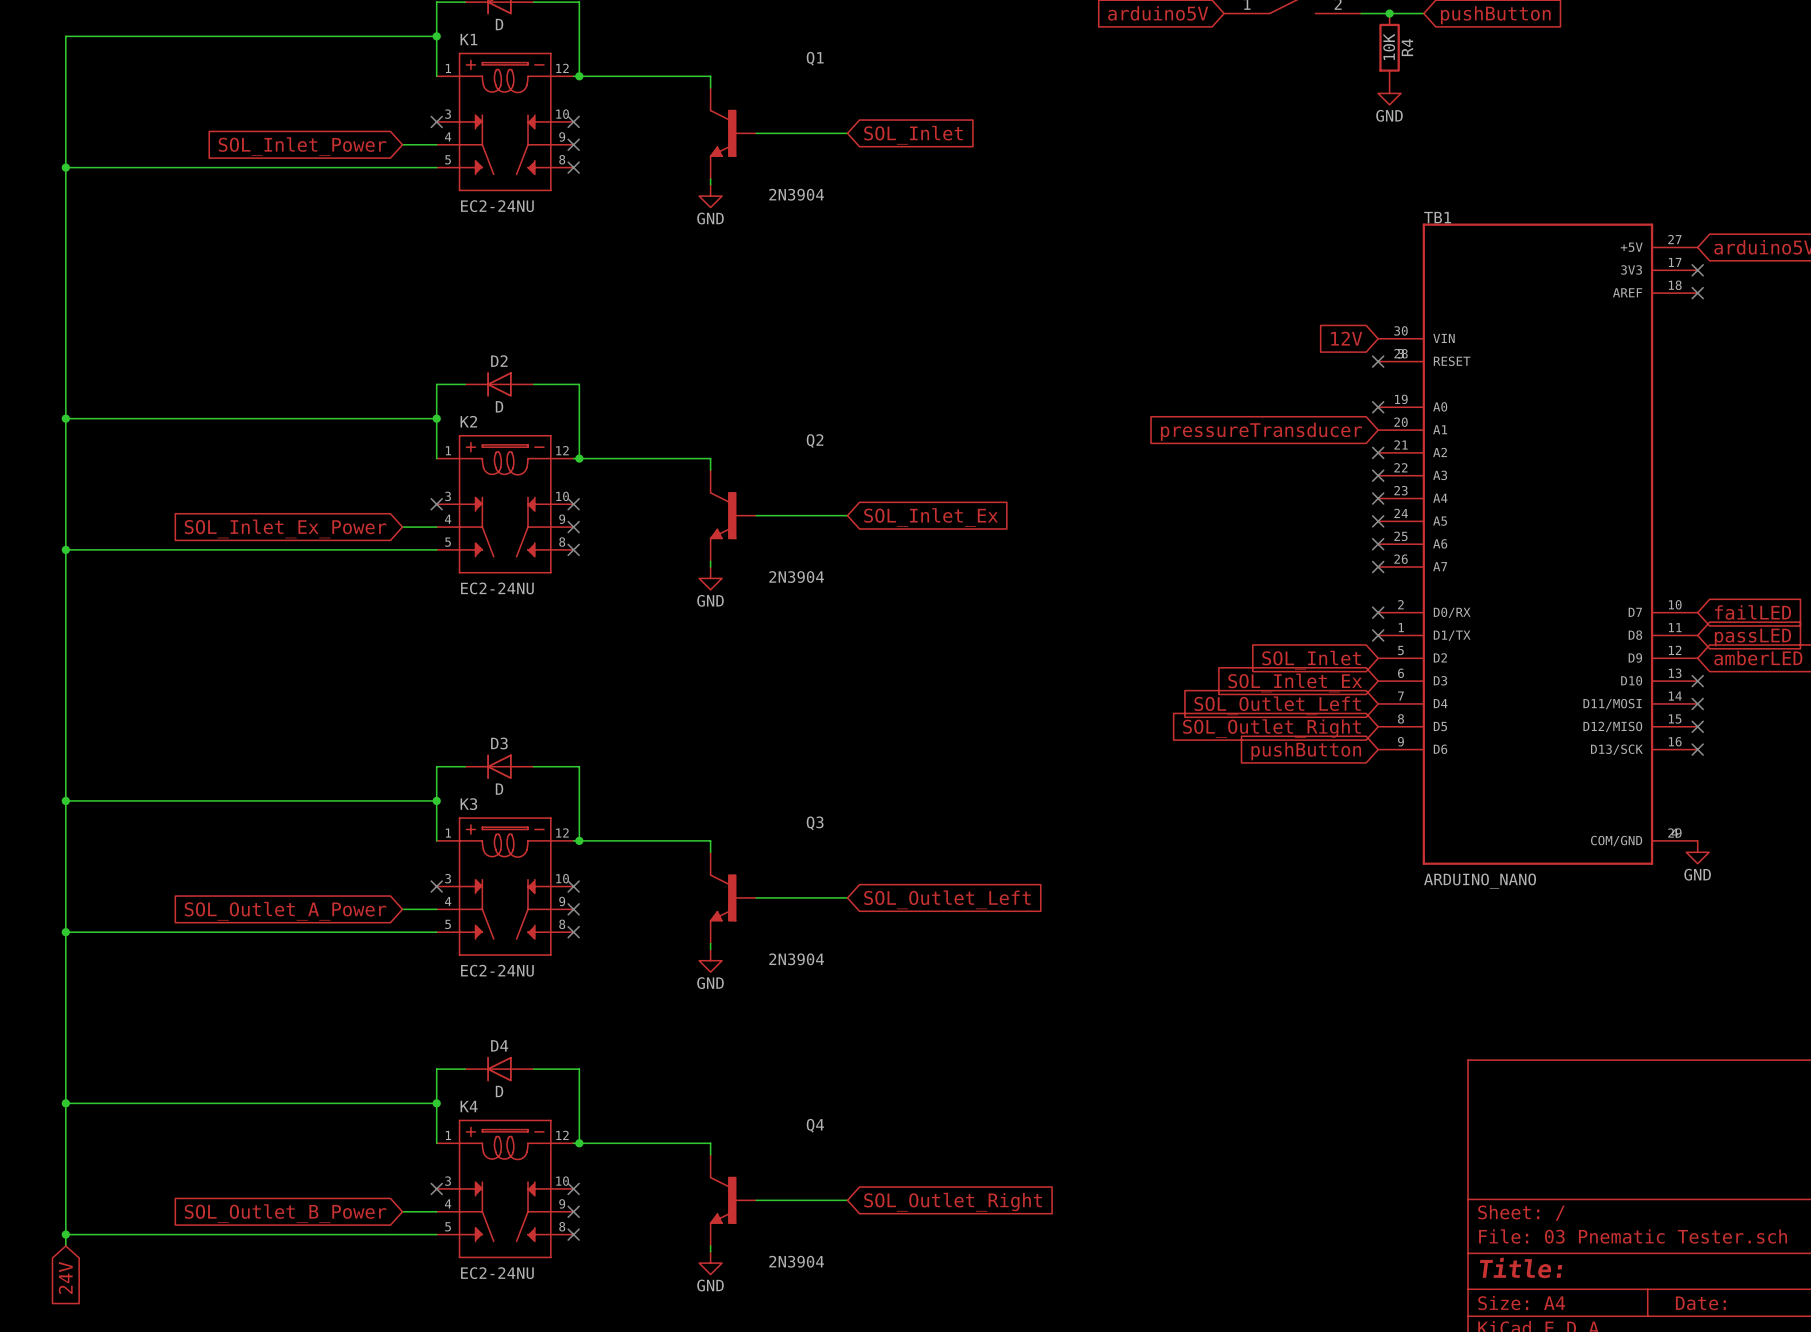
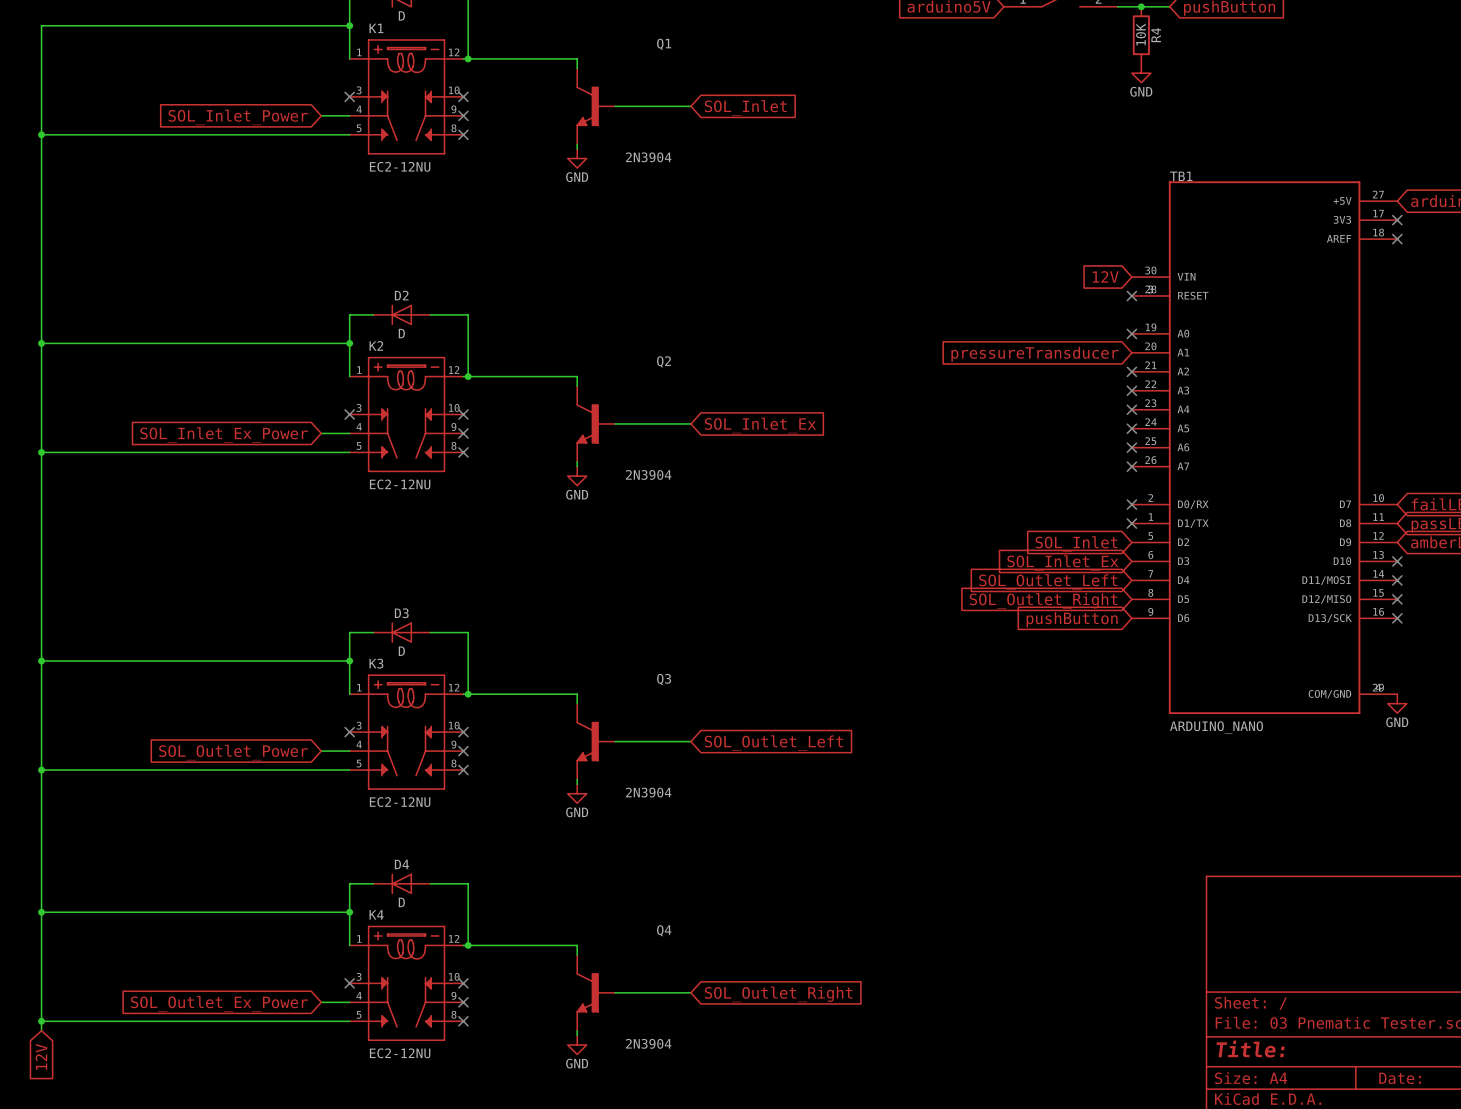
K1 value: EC2-24NU (497, 206) -> EC2-12NU (400, 166)
K2 value: EC2-24NU (497, 588) -> EC2-12NU (400, 484)
global label: SOL_Outlet_A_Power (285, 911) -> SOL_Outlet_Power (233, 752)
K3 value: EC2-24NU (497, 970) -> EC2-12NU (400, 802)
global label: SOL_Outlet_B_Power (285, 1213) -> SOL_Outlet_Ex_Power (219, 1003)
K4 value: EC2-24NU (497, 1273) -> EC2-12NU (400, 1053)
global label: 24V (65, 1277) -> 12V (41, 1056)

